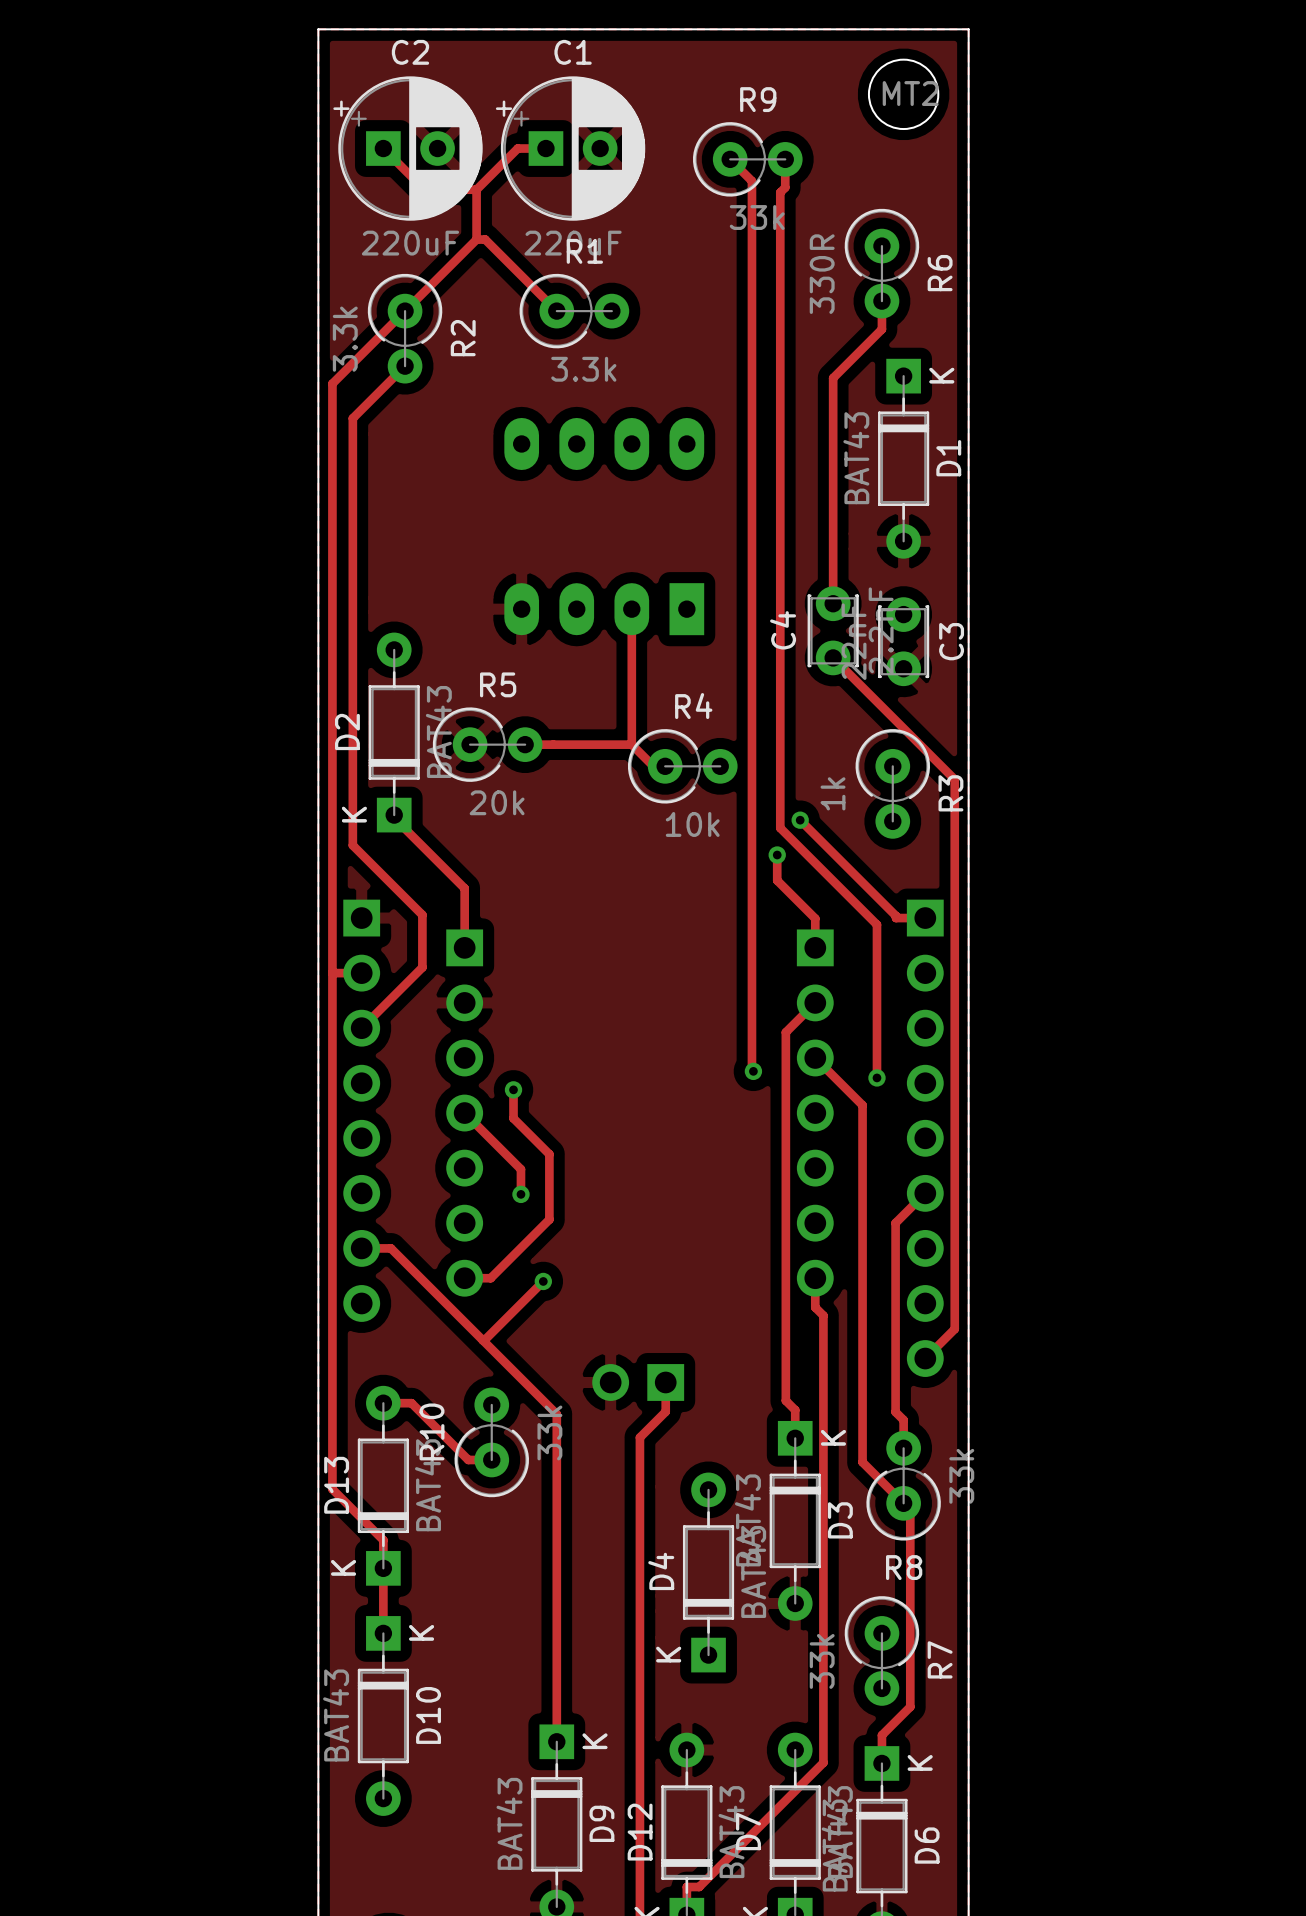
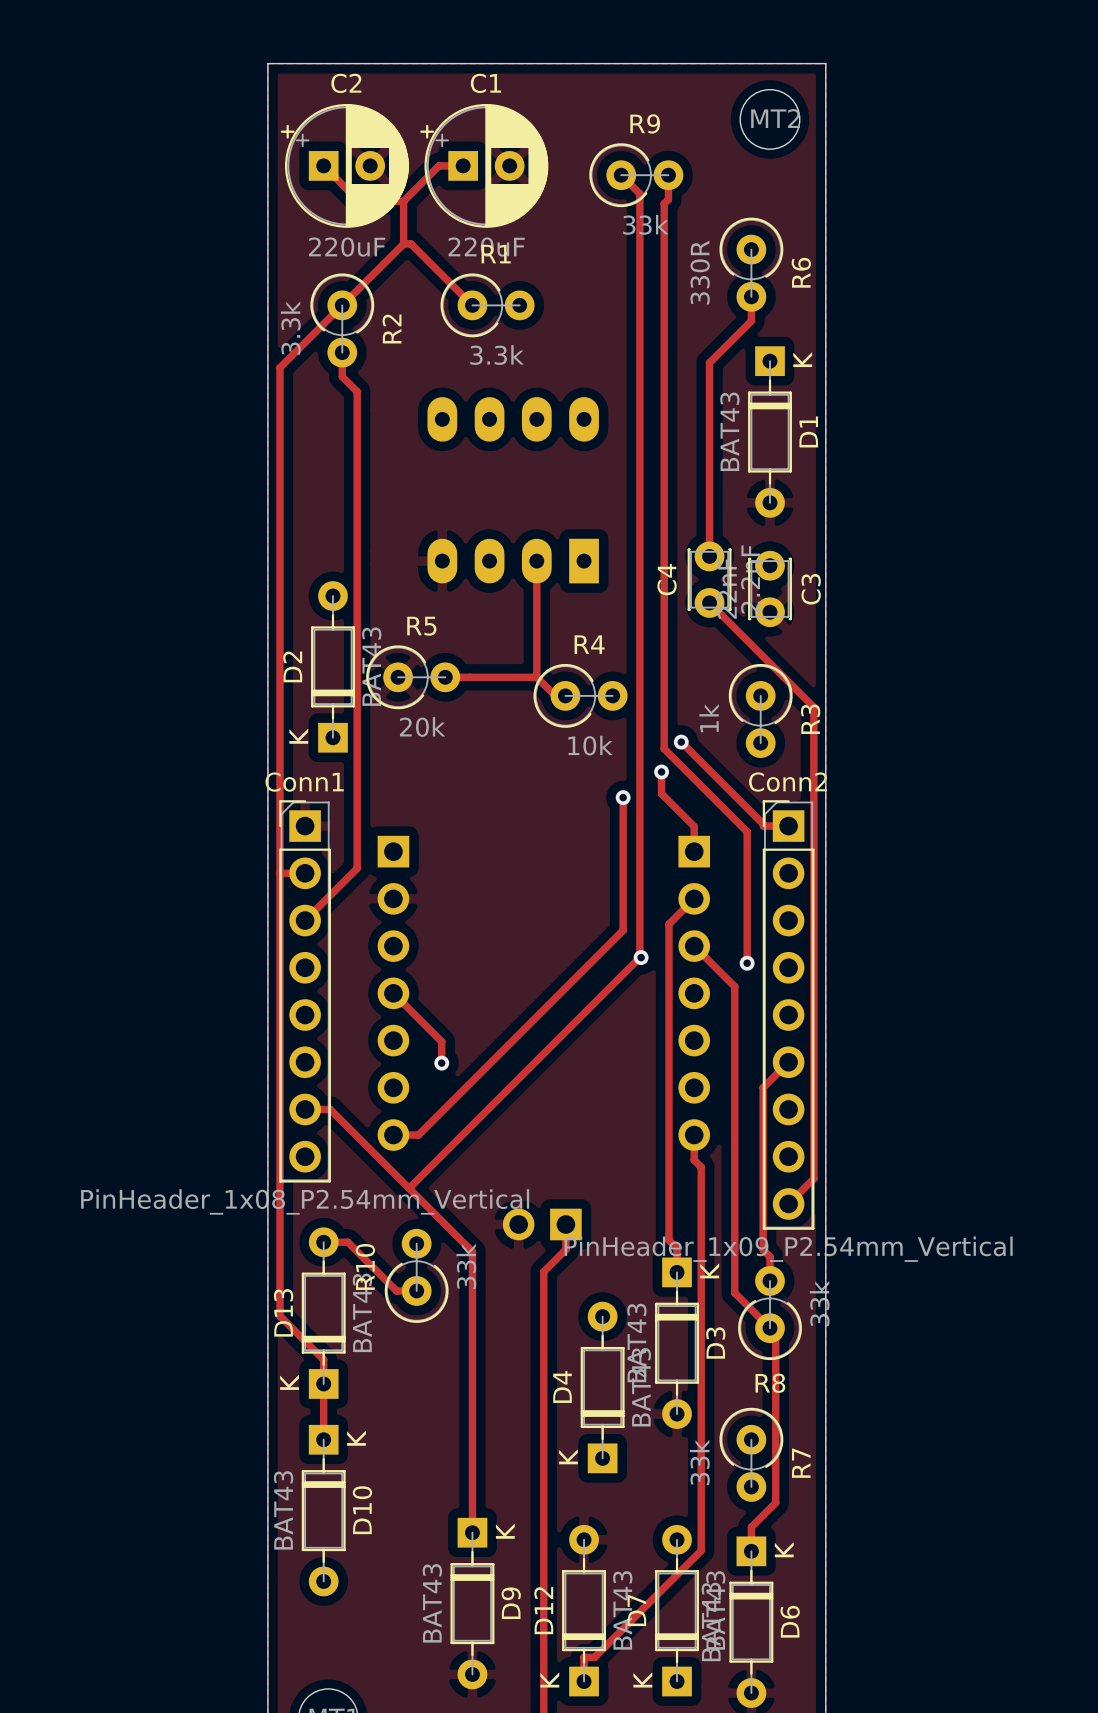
track: (405, 366) (352, 418) (352, 845) (422, 914) -> (342, 352) (342, 376) (357, 391) (357, 823)
track: (394, 815) (394, 817) (464, 888) (464, 947) -> none
via: none -> (623, 797)
track: (513, 1089) (513, 1118) (549, 1154) (549, 1219) (490, 1278) -> (623, 797) (623, 930) (418, 1135) (415, 1135)
via: (513, 1089) -> none
Conn1 side: bottom (361, 1110) -> top (305, 991)
Conn2 side: bottom (925, 1138) -> top (788, 1015)
track: (543, 1281) (482, 1340) -> (639, 957) (409, 1188)
via: (543, 1281) -> none

